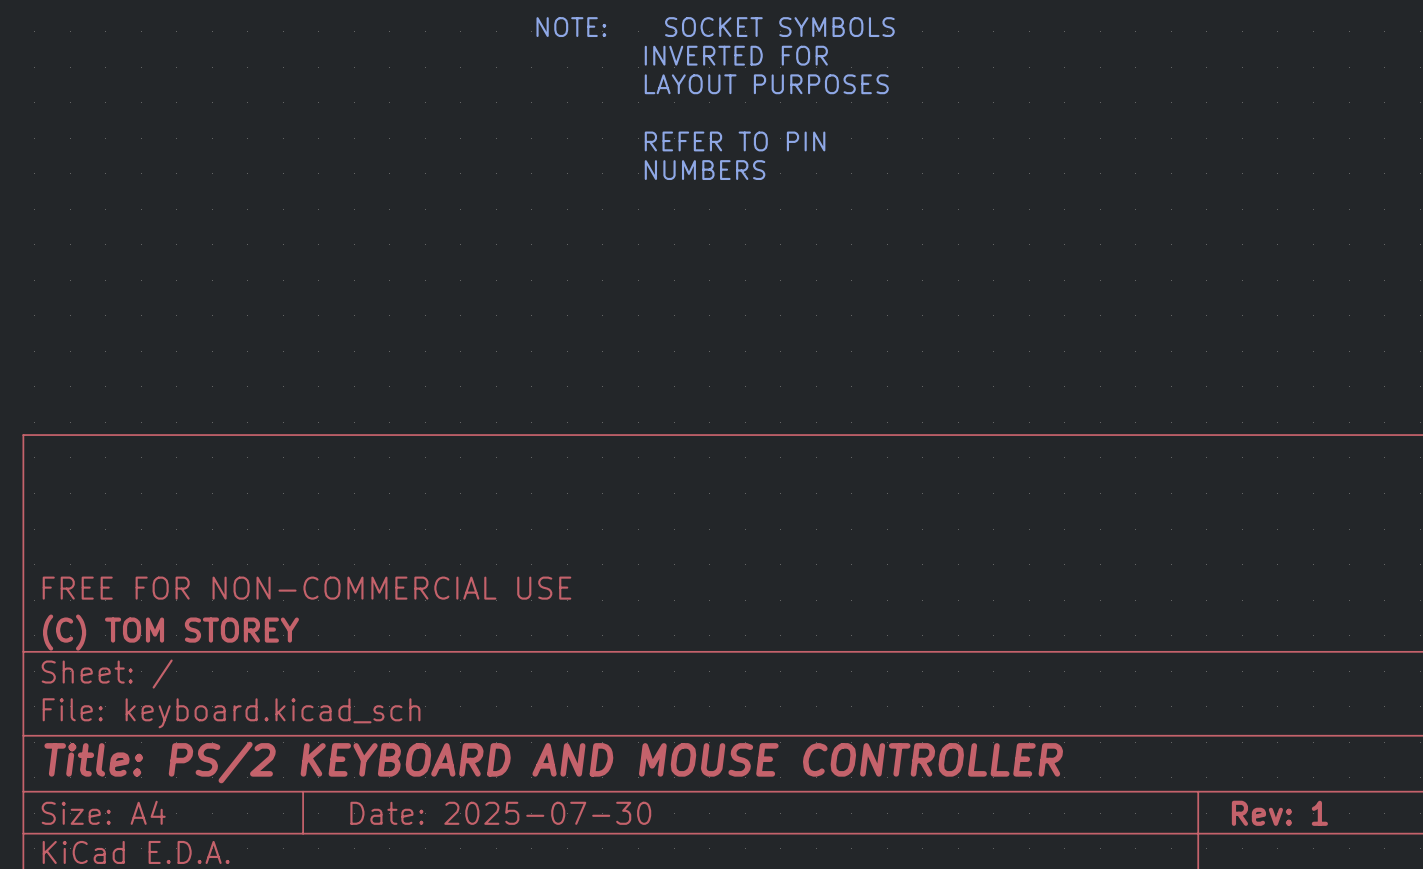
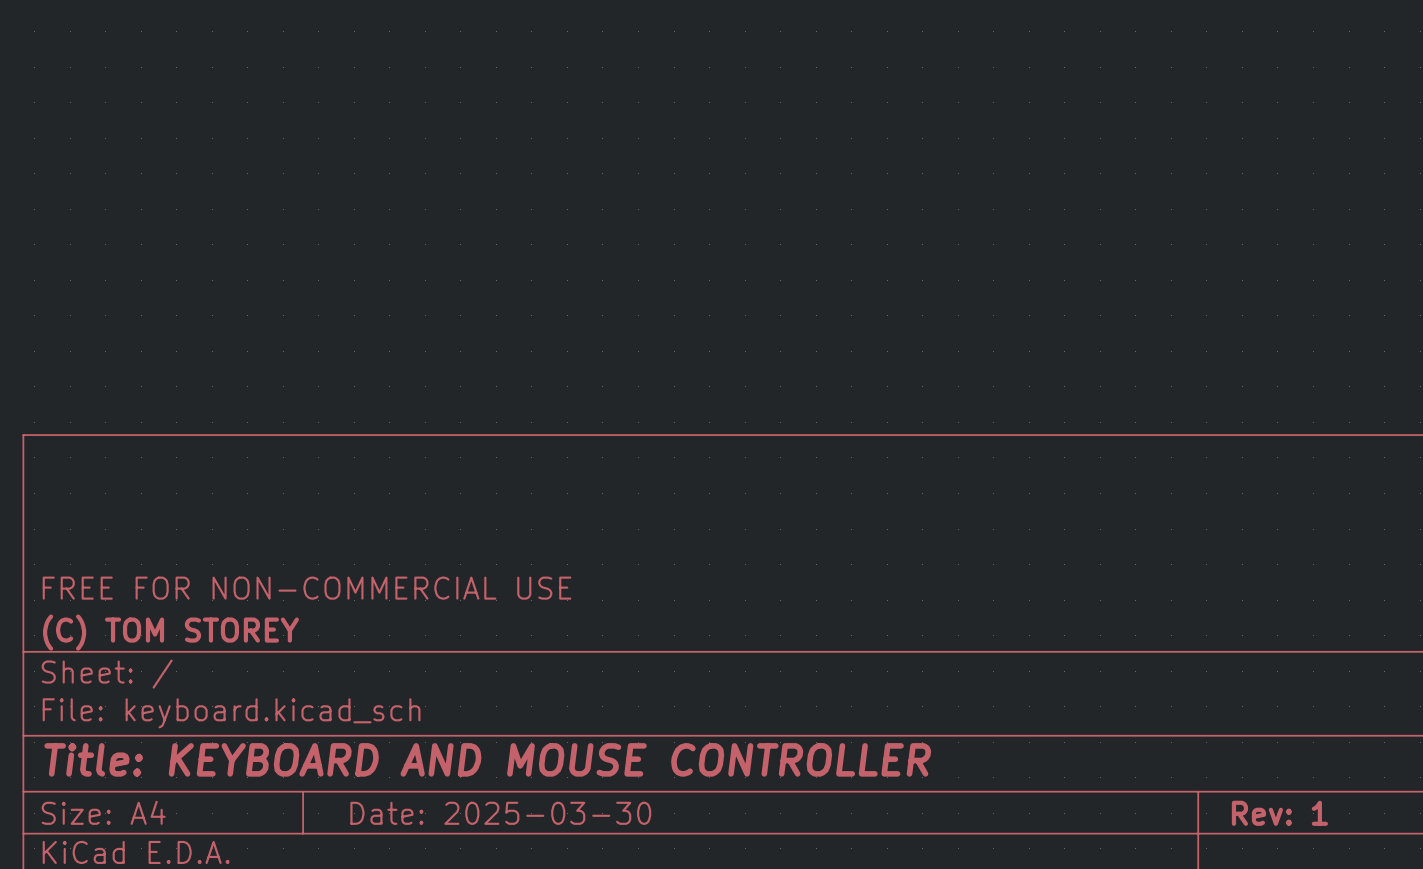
text: NOTE: SOCKET SYMBOLS (715, 27) -> none
text: INVERTED FOR (736, 55) -> none
text: LAYOUT PURPOSES (766, 84) -> none
text: REFER TO PIN (735, 141) -> none
text: NUMBERS (705, 170) -> none
title block: Title: PS/2 KEYBOARD AND MOUSE CONTROLLER (553, 762) -> Title: KEYBOARD AND MOUSE CONTROLLER (487, 759)
title block: Date: 2025-07-30 (500, 813) -> Date: 2025-03-30 (500, 813)

